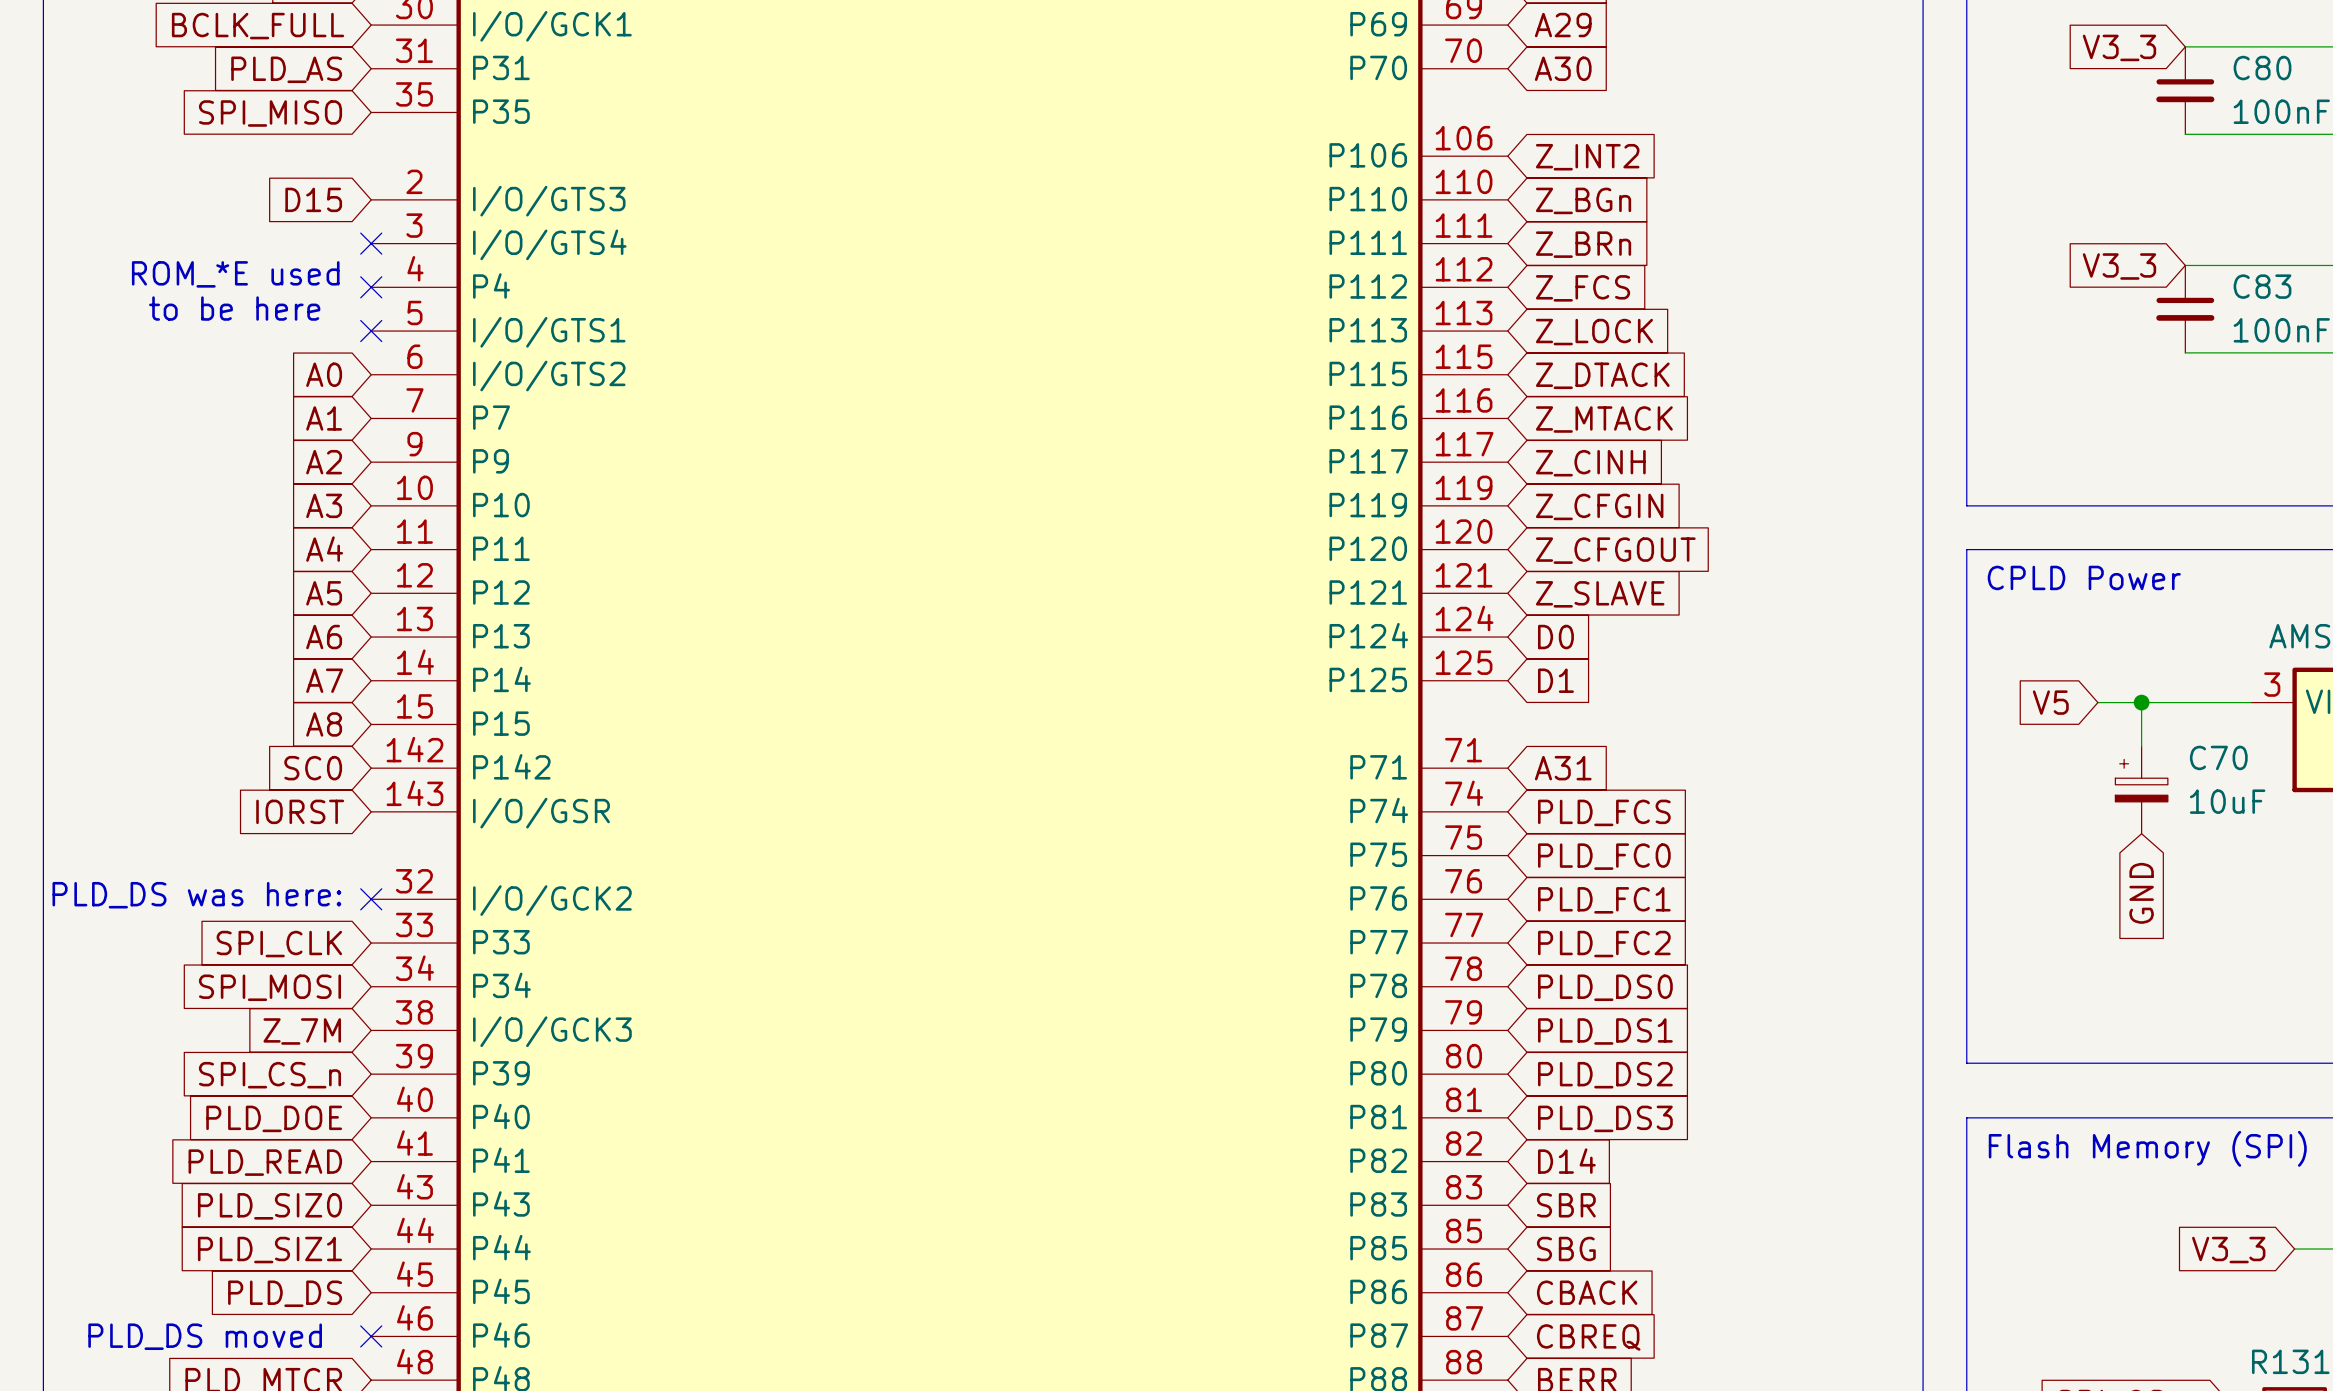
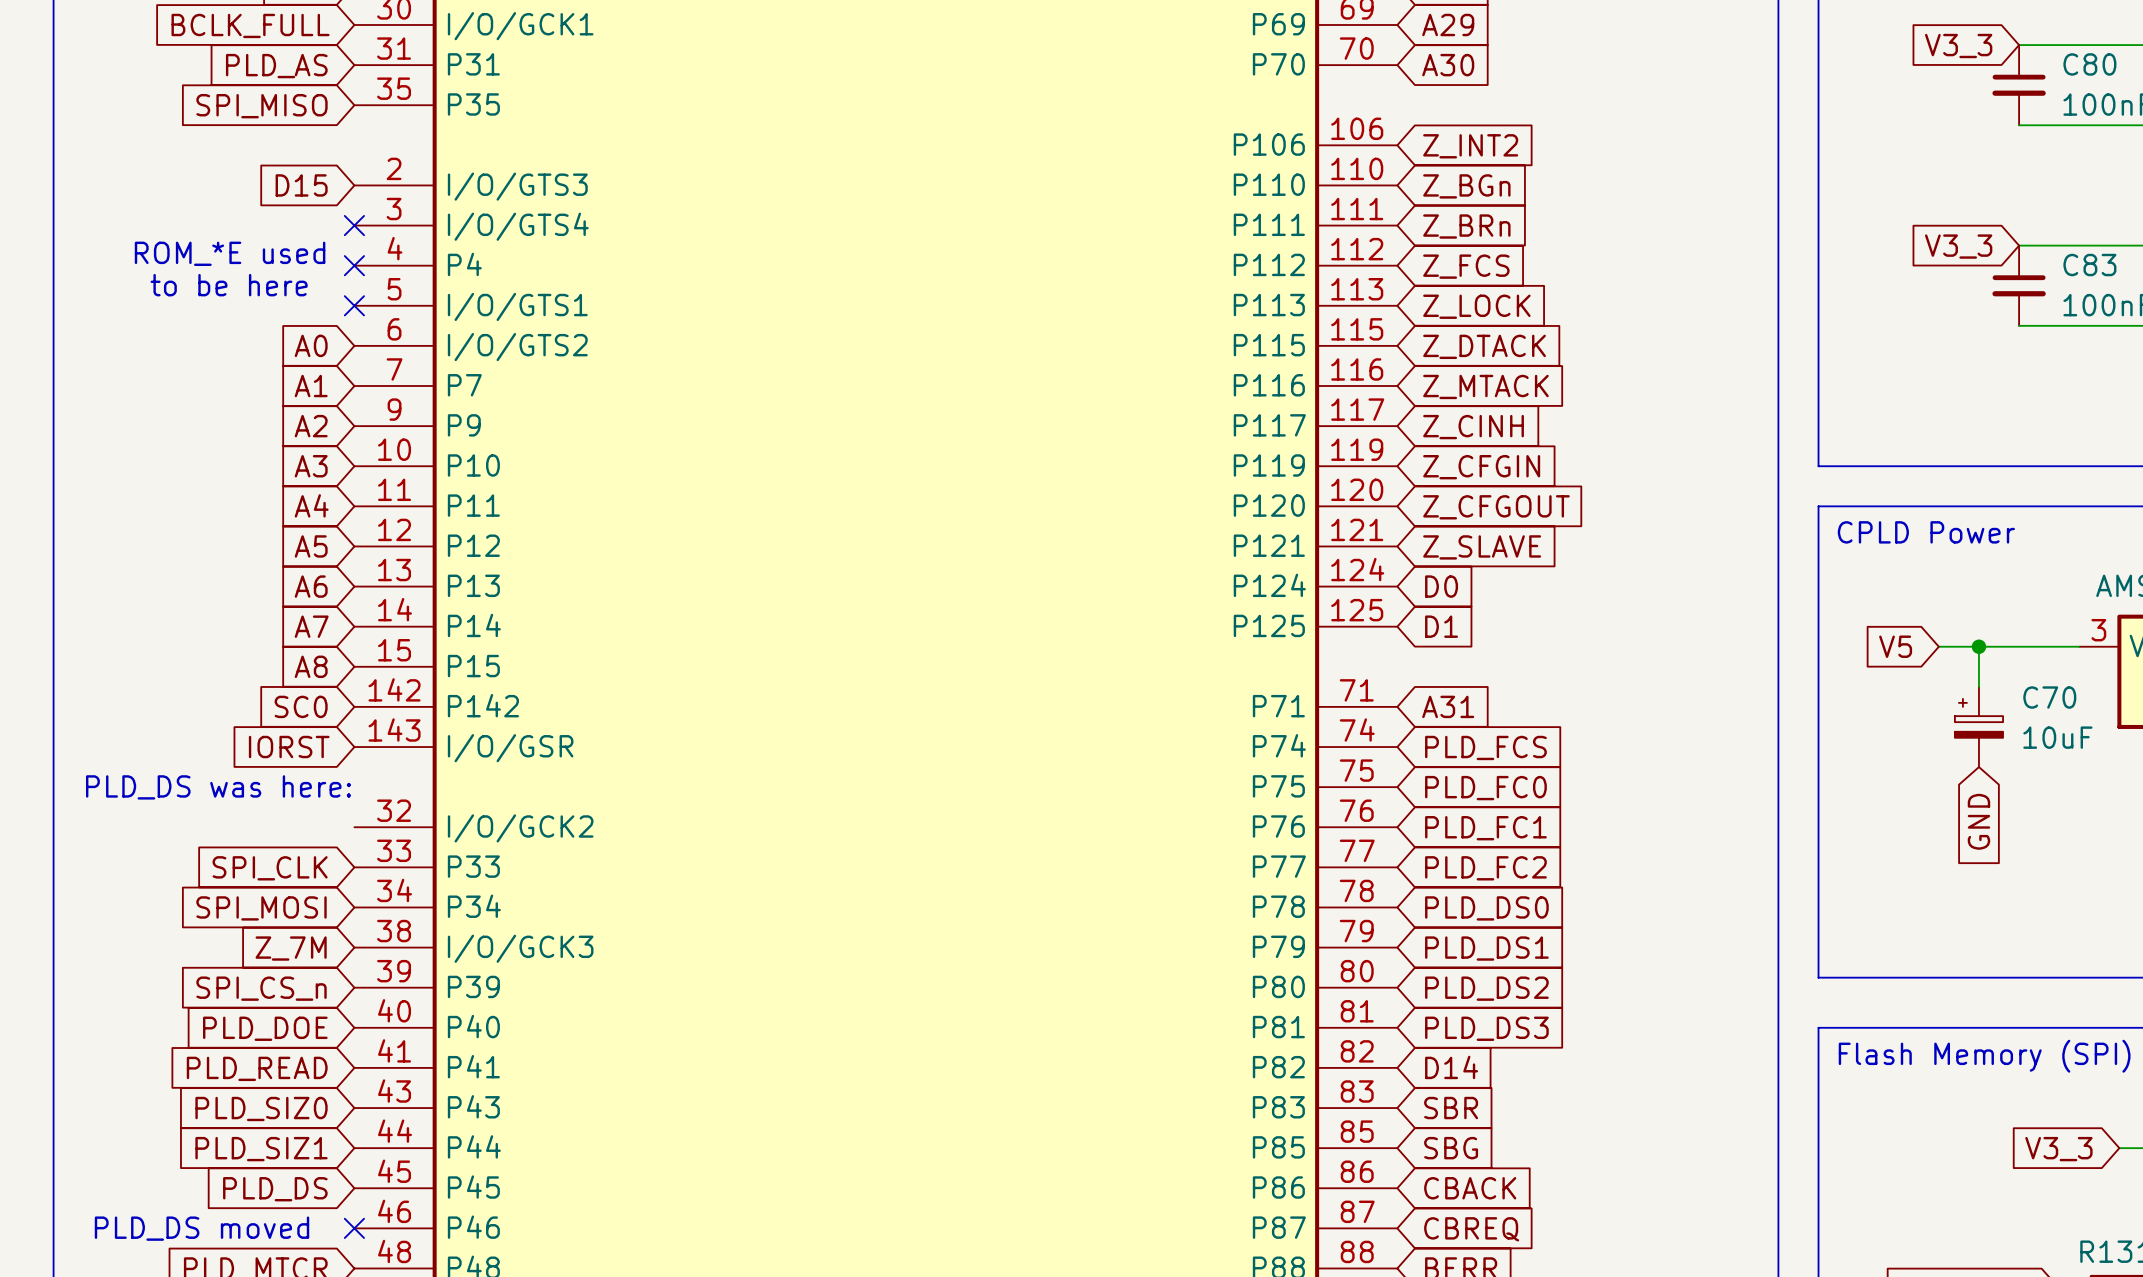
text position: PLD_DS was here: (196, 895) -> PLD_DS was here: (218, 787)
no-connect mark: (371, 899) -> none

